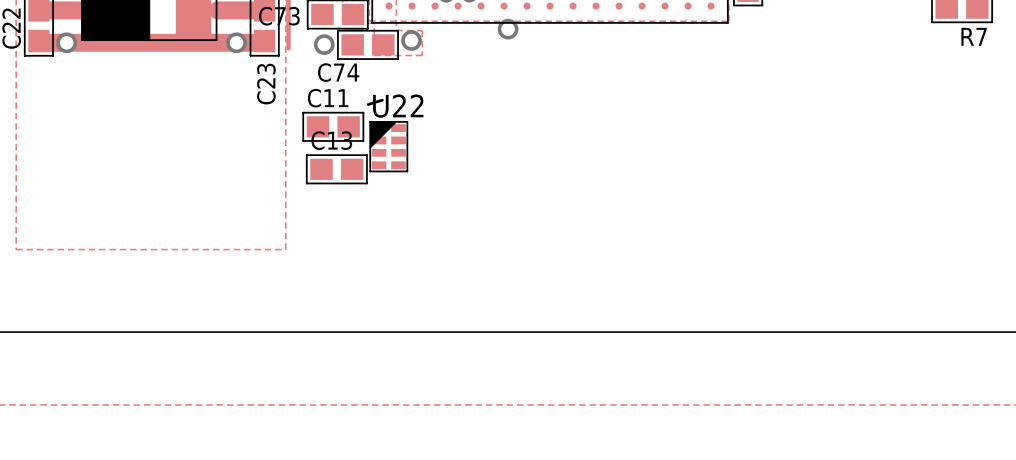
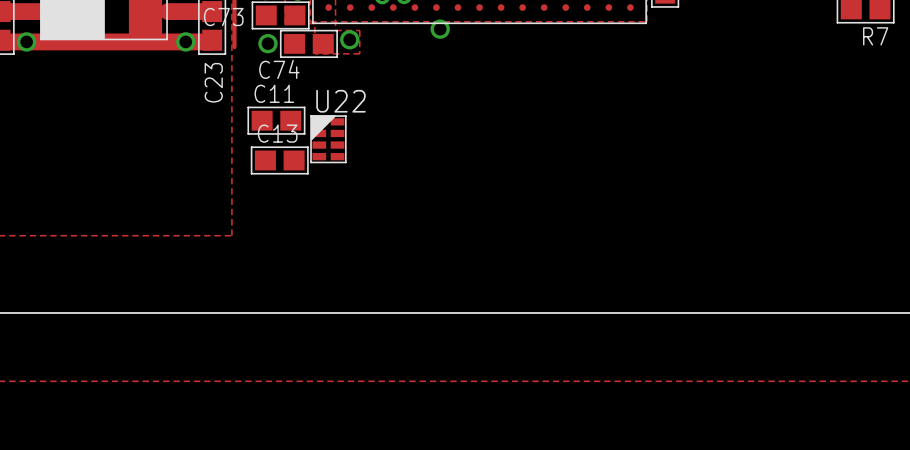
line: (382, 100) (368, 104) -> none

